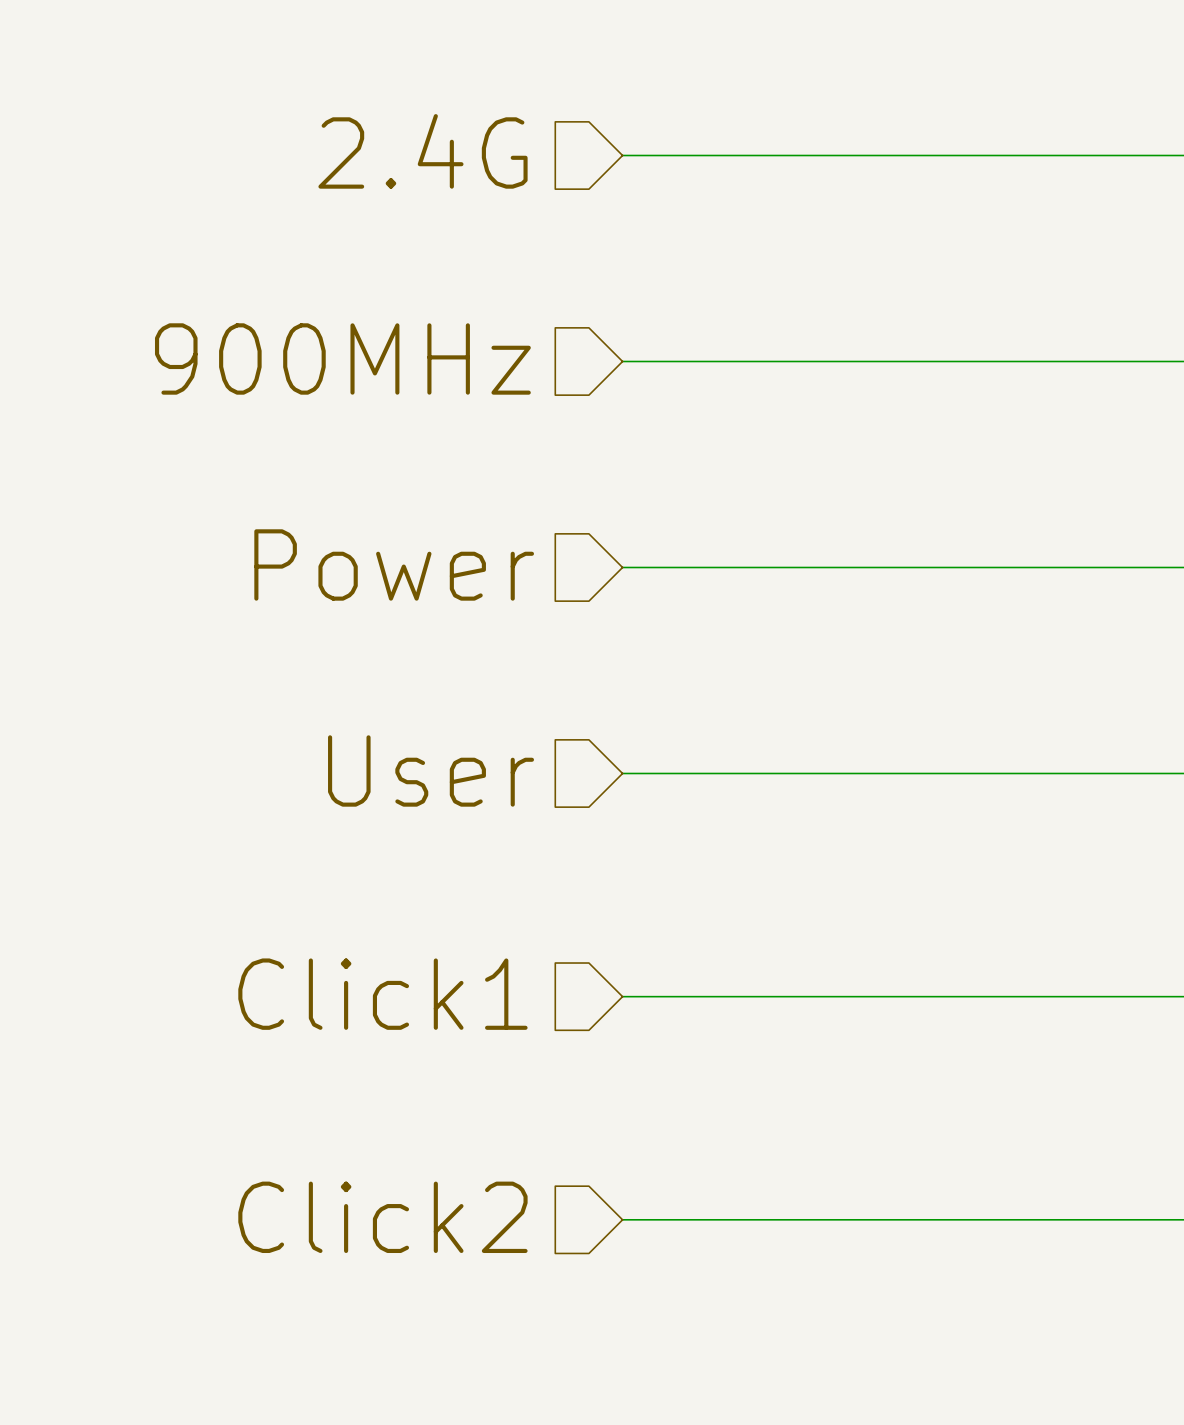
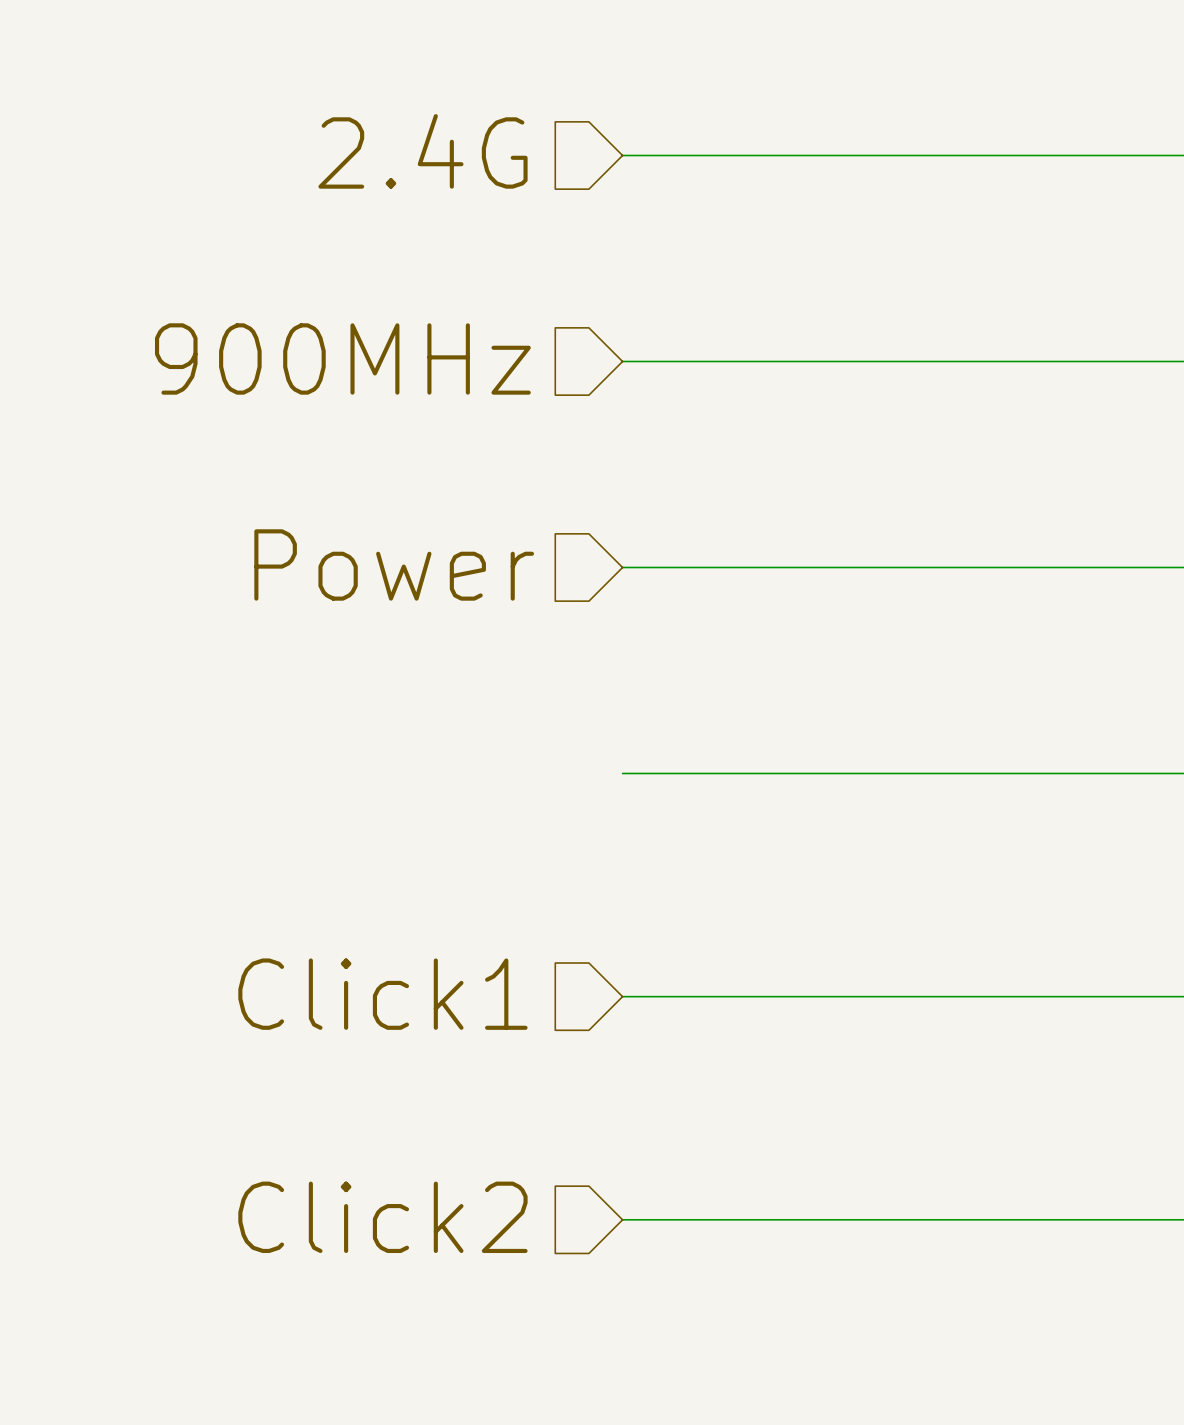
hierarchical label: User (431, 770) -> none

